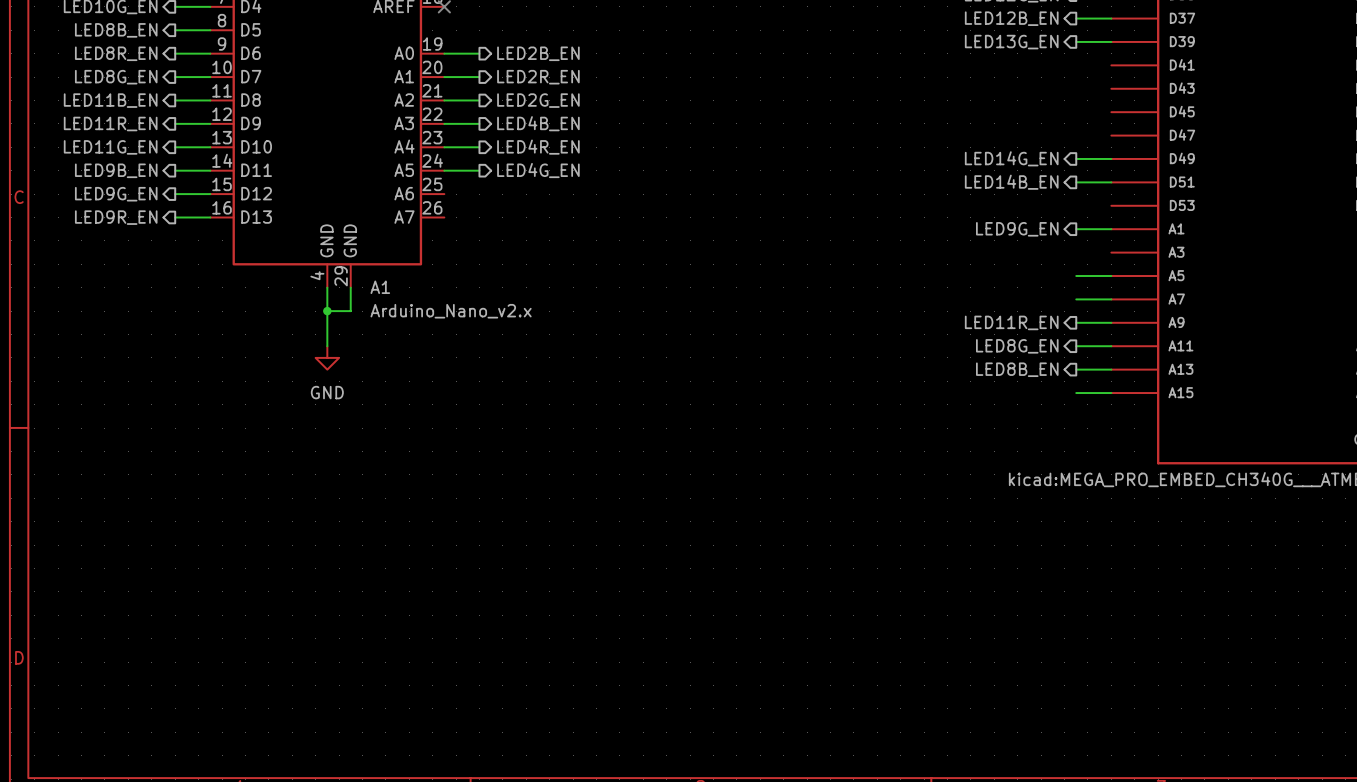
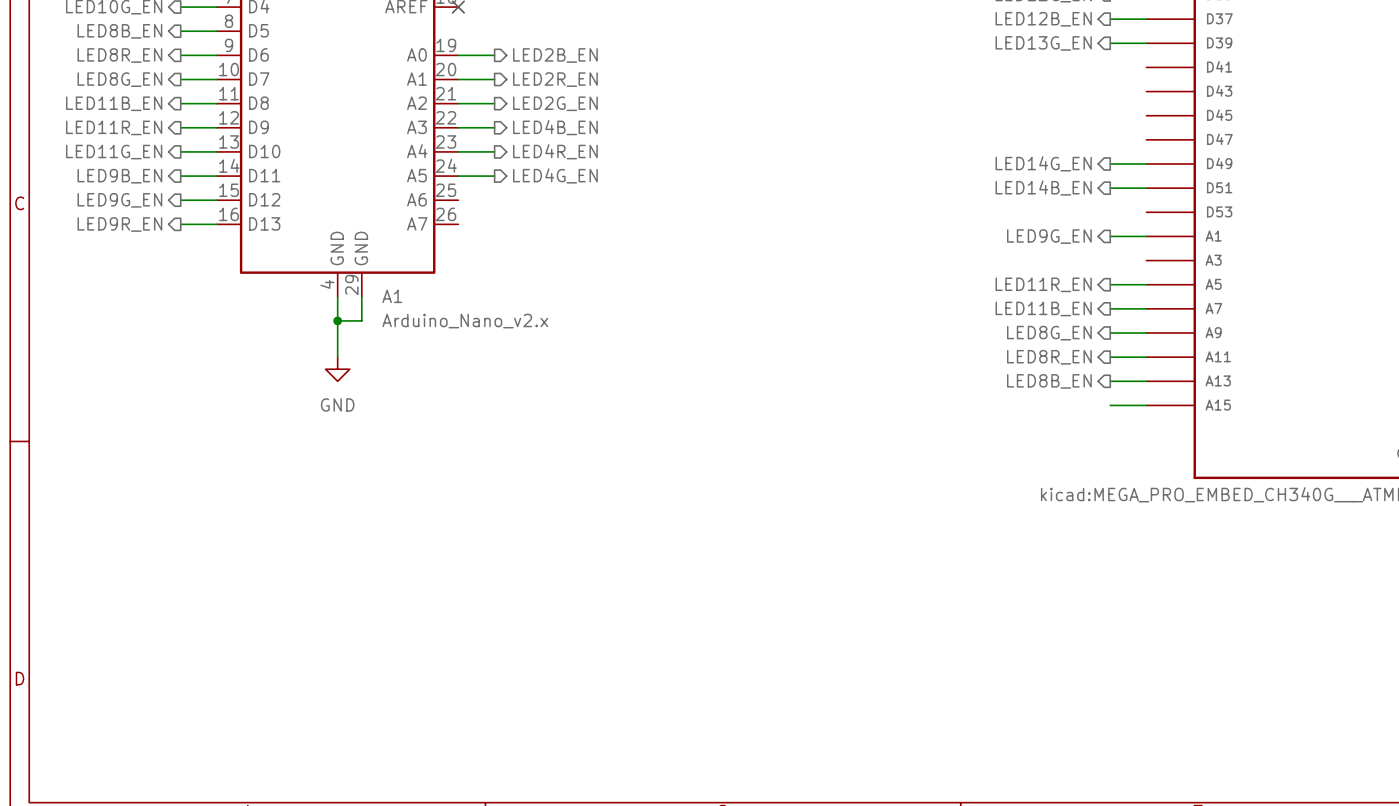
hierarchical label: none -> LED11R_EN (1043, 284)
hierarchical label: none -> LED11B_EN (1043, 308)
hierarchical label: LED11R_EN (1011, 322) -> LED8G_EN (1049, 333)
hierarchical label: LED8G_EN (1017, 346) -> LED8R_EN (1049, 357)

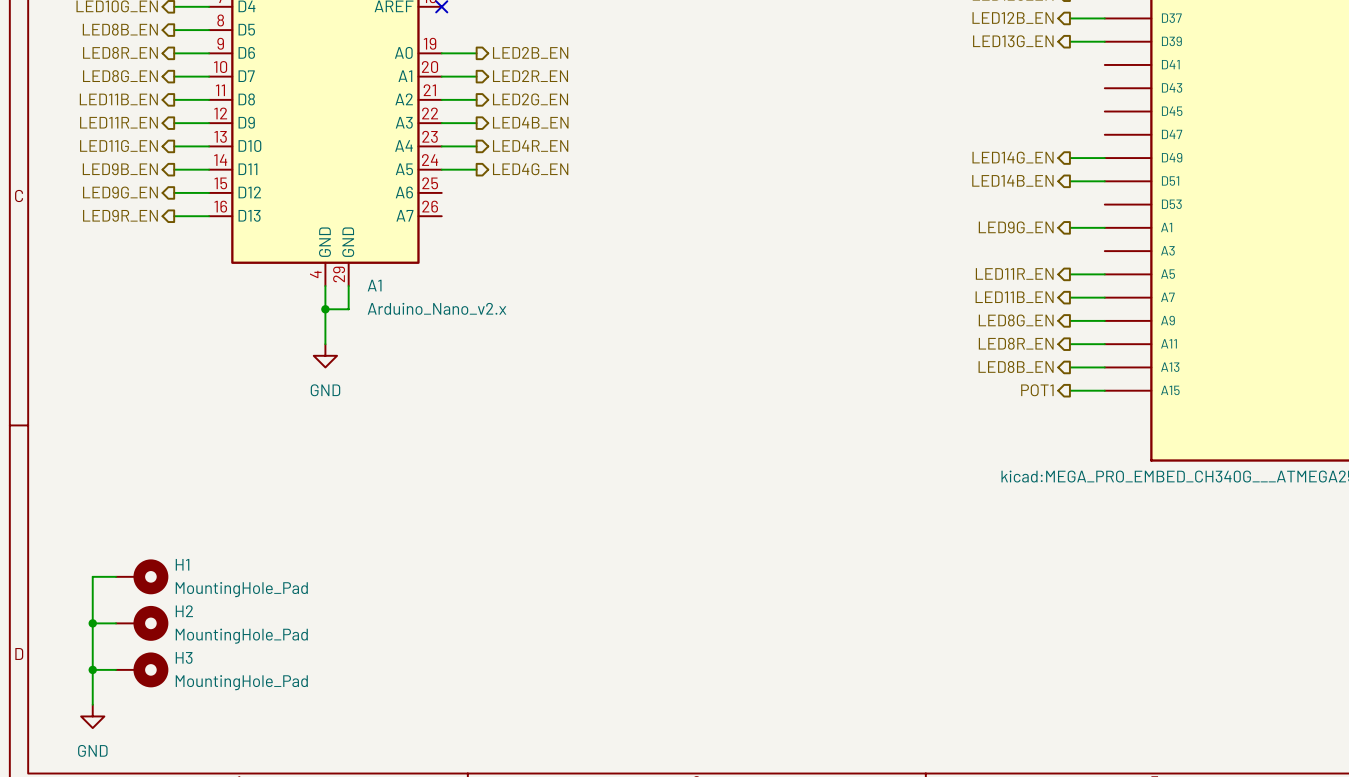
hierarchical label: none -> POT1 (1037, 390)
wire: none -> (116, 576) (92, 576) (92, 704)
H1: none -> MountingHole_Pad (142, 576)
wire: none -> (92, 623) (116, 623)
junction: none -> (92, 623)
H2: none -> MountingHole_Pad (142, 623)
wire: none -> (92, 669) (116, 669)
junction: none -> (92, 669)
H3: none -> MountingHole_Pad (142, 669)
power symbol: none -> GND (92, 716)

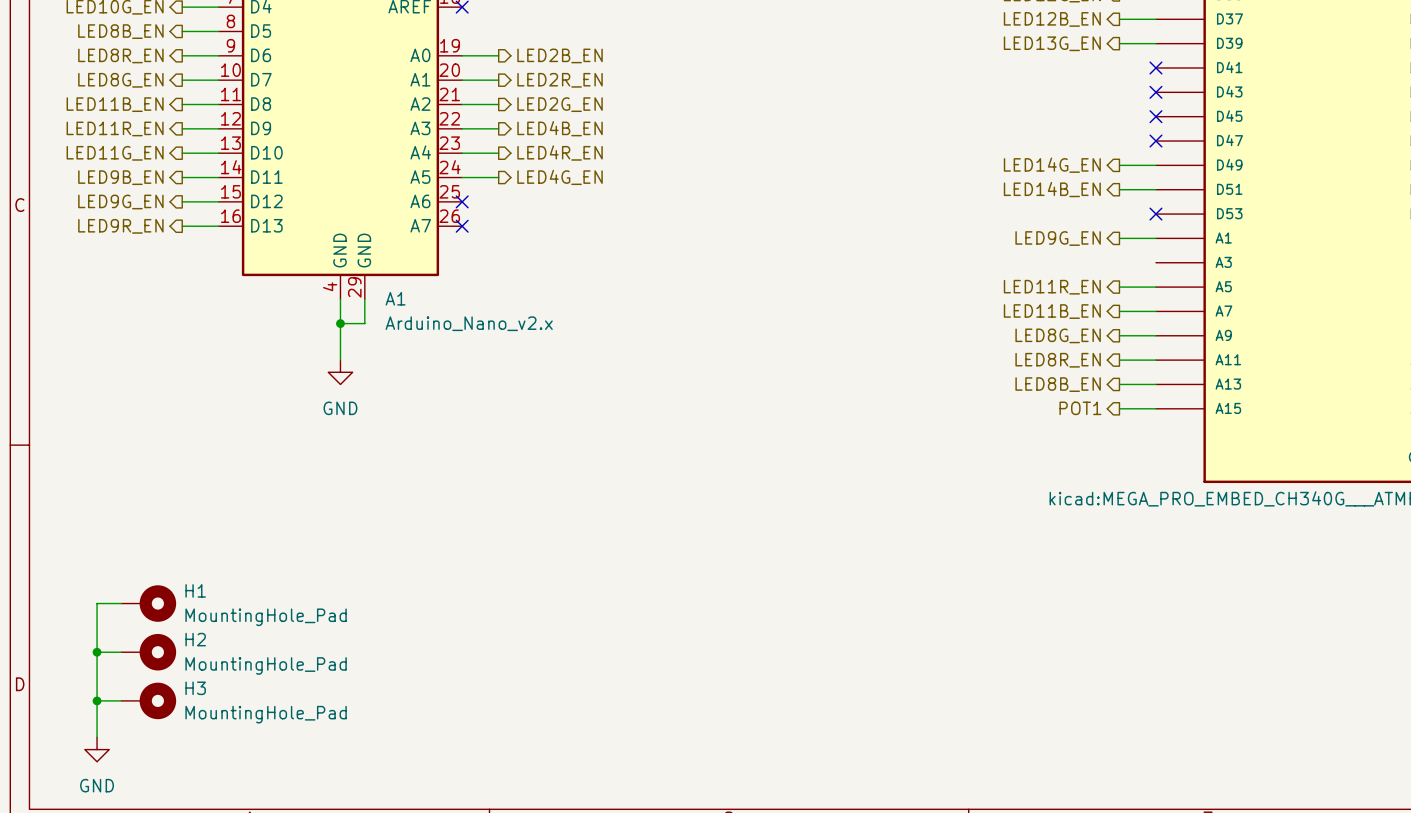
no-connect mark: none -> (1155, 67)
no-connect mark: none -> (1155, 92)
no-connect mark: none -> (1155, 116)
no-connect mark: none -> (1155, 141)
no-connect mark: none -> (462, 201)
no-connect mark: none -> (1155, 214)
no-connect mark: none -> (462, 226)

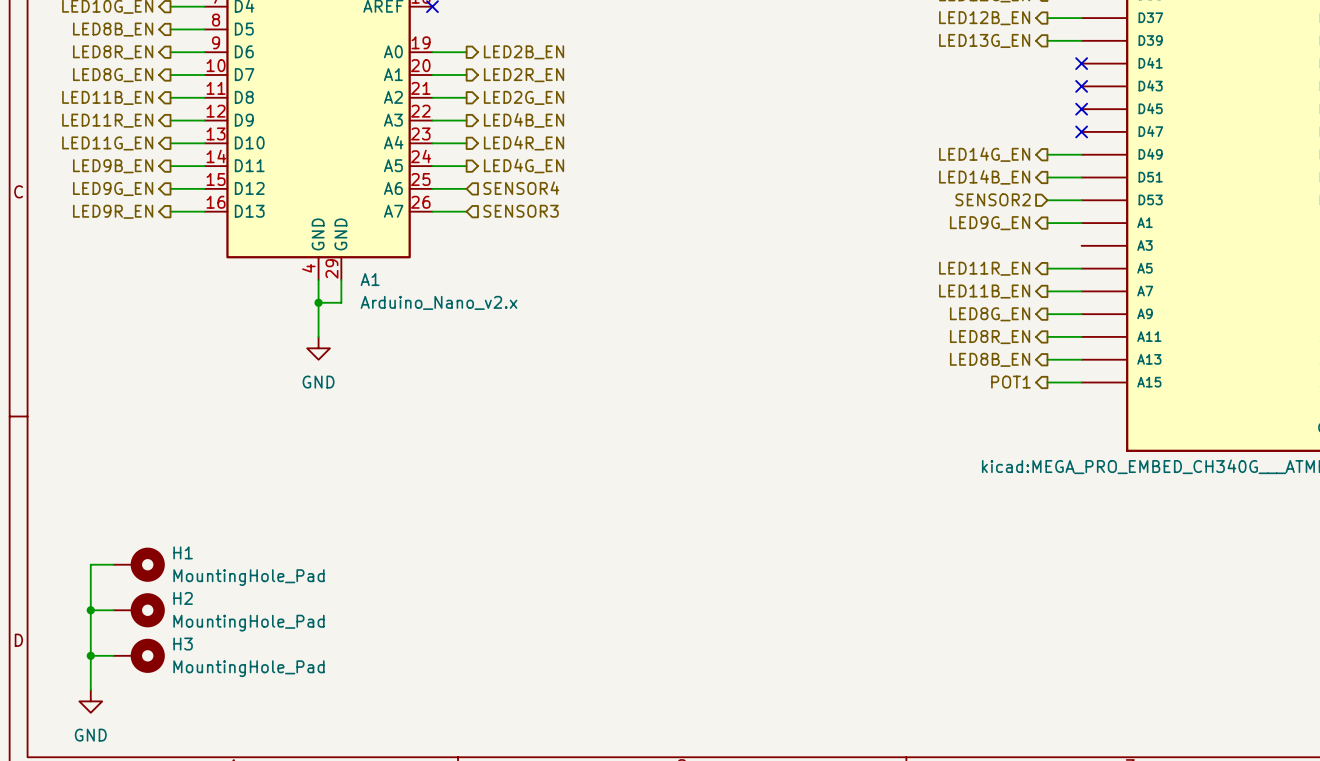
wire: none -> (432, 188) (466, 188)
no-connect mark: (462, 201) -> none
hierarchical label: none -> SENSOR4 (521, 188)
hierarchical label: none -> SENSOR2 (993, 199)
wire: none -> (1047, 200) (1081, 200)
no-connect mark: (1155, 214) -> none
hierarchical label: none -> SENSOR3 (521, 211)
wire: none -> (432, 211) (466, 211)
no-connect mark: (462, 226) -> none

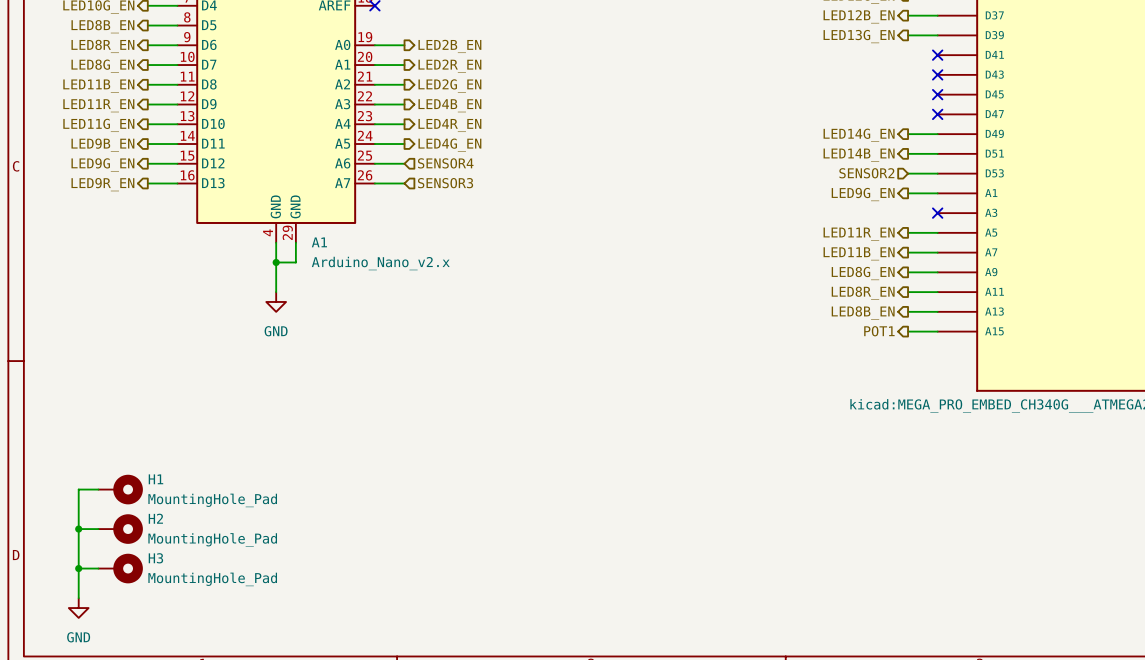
no-connect mark: none -> (937, 213)

